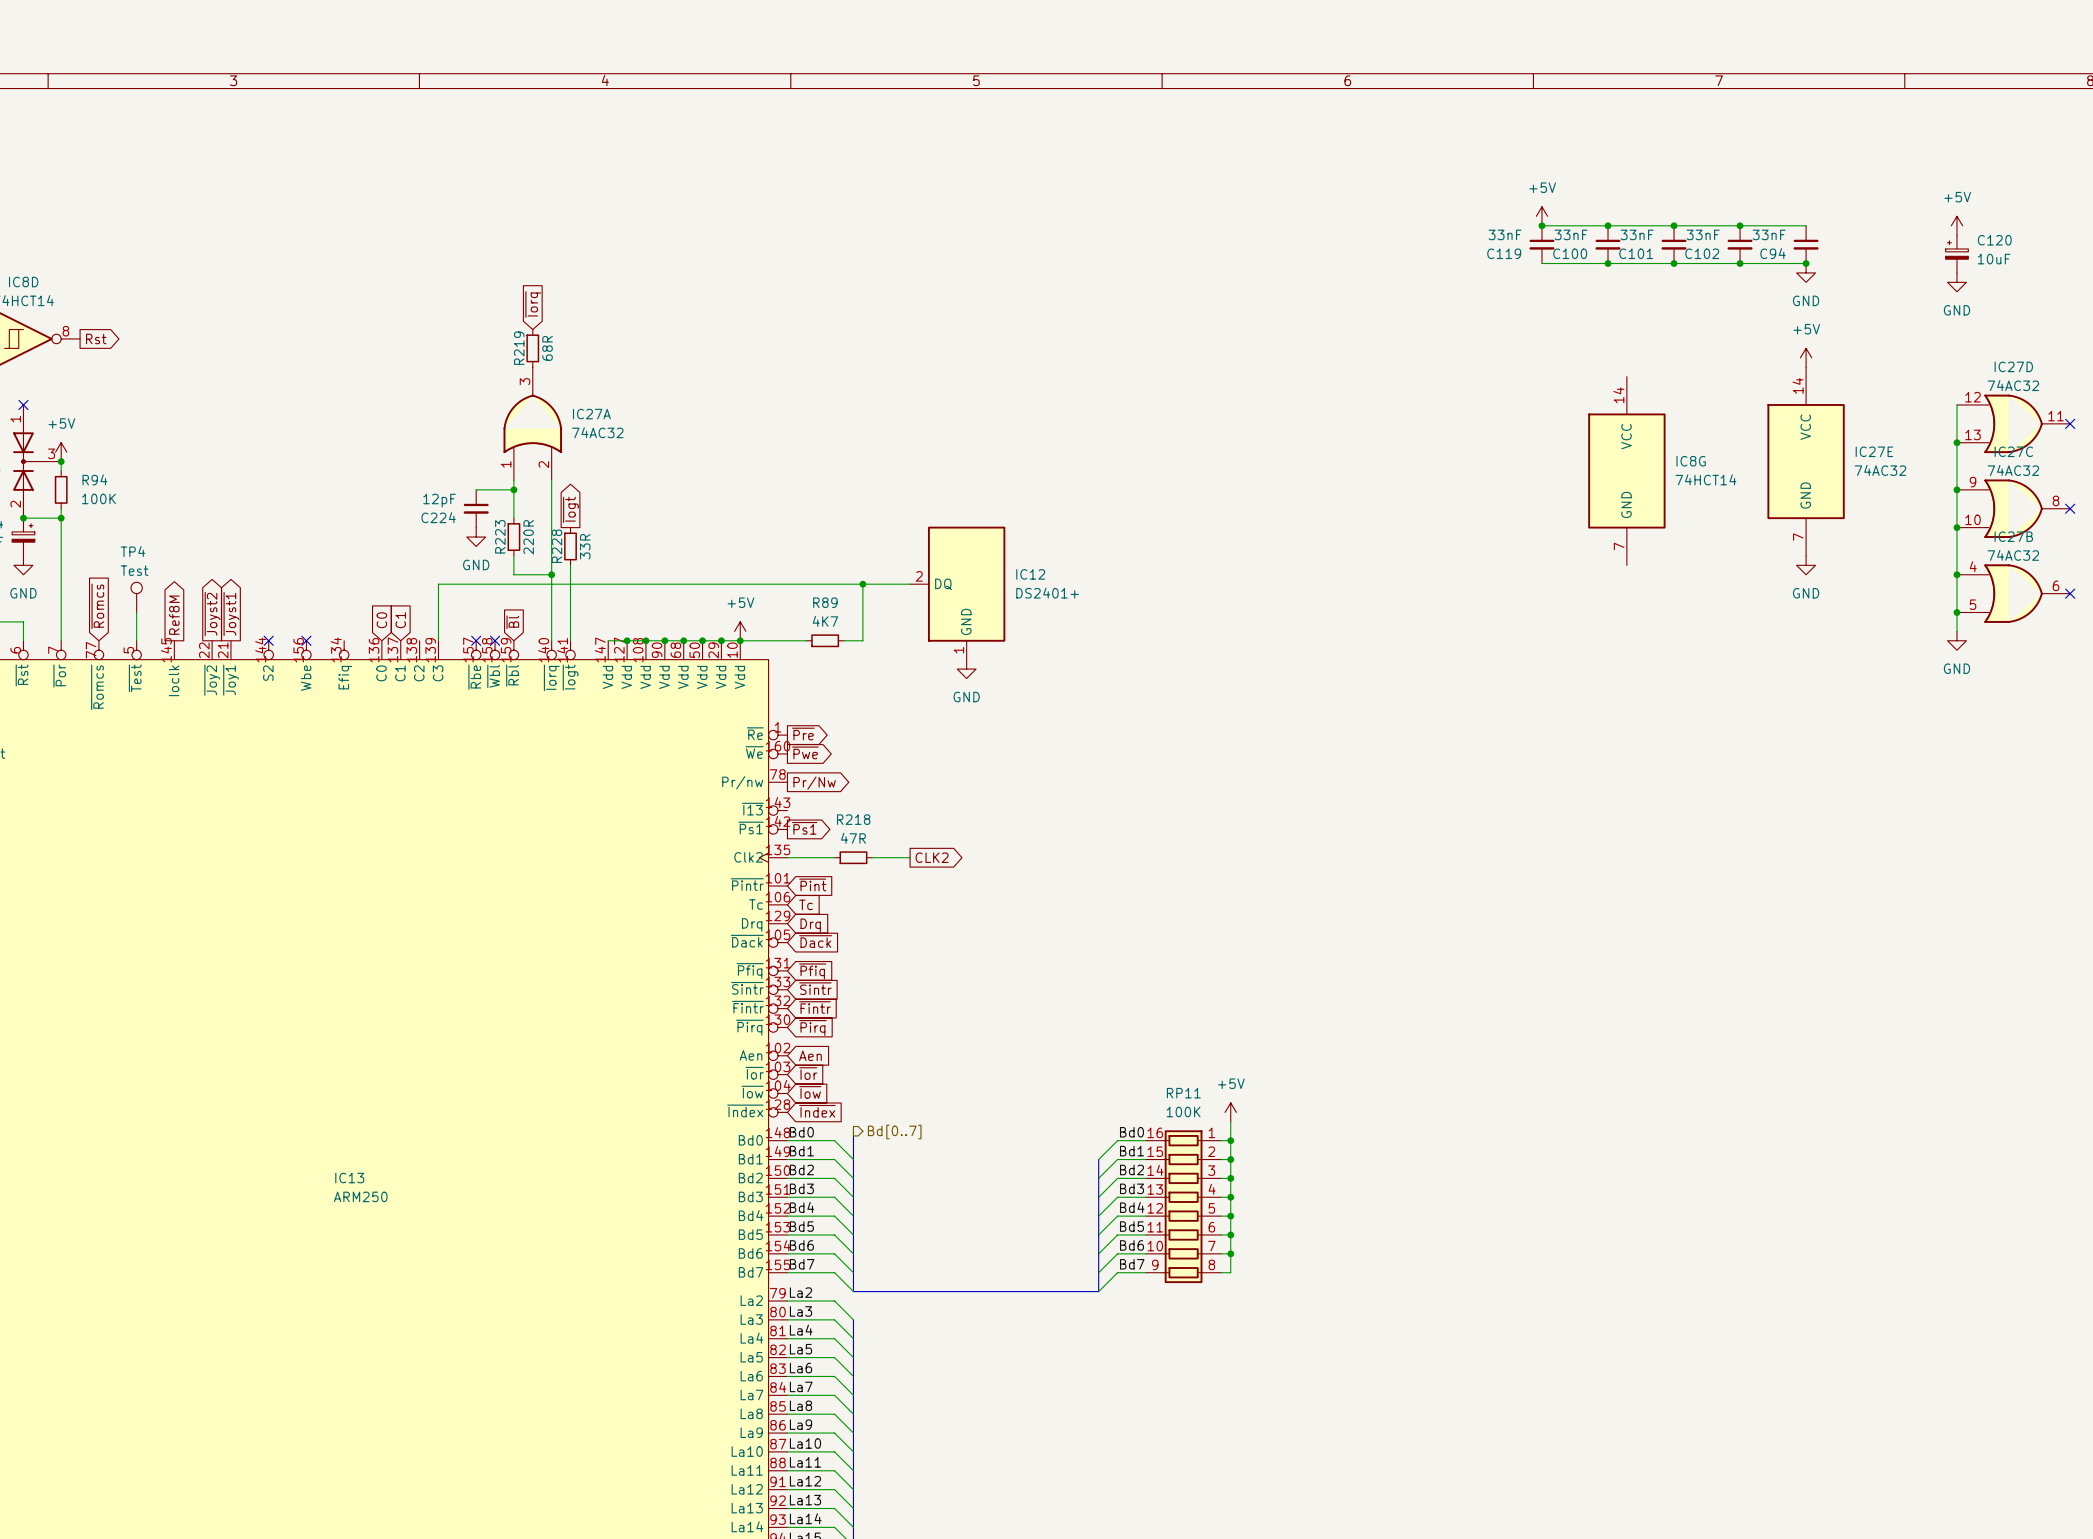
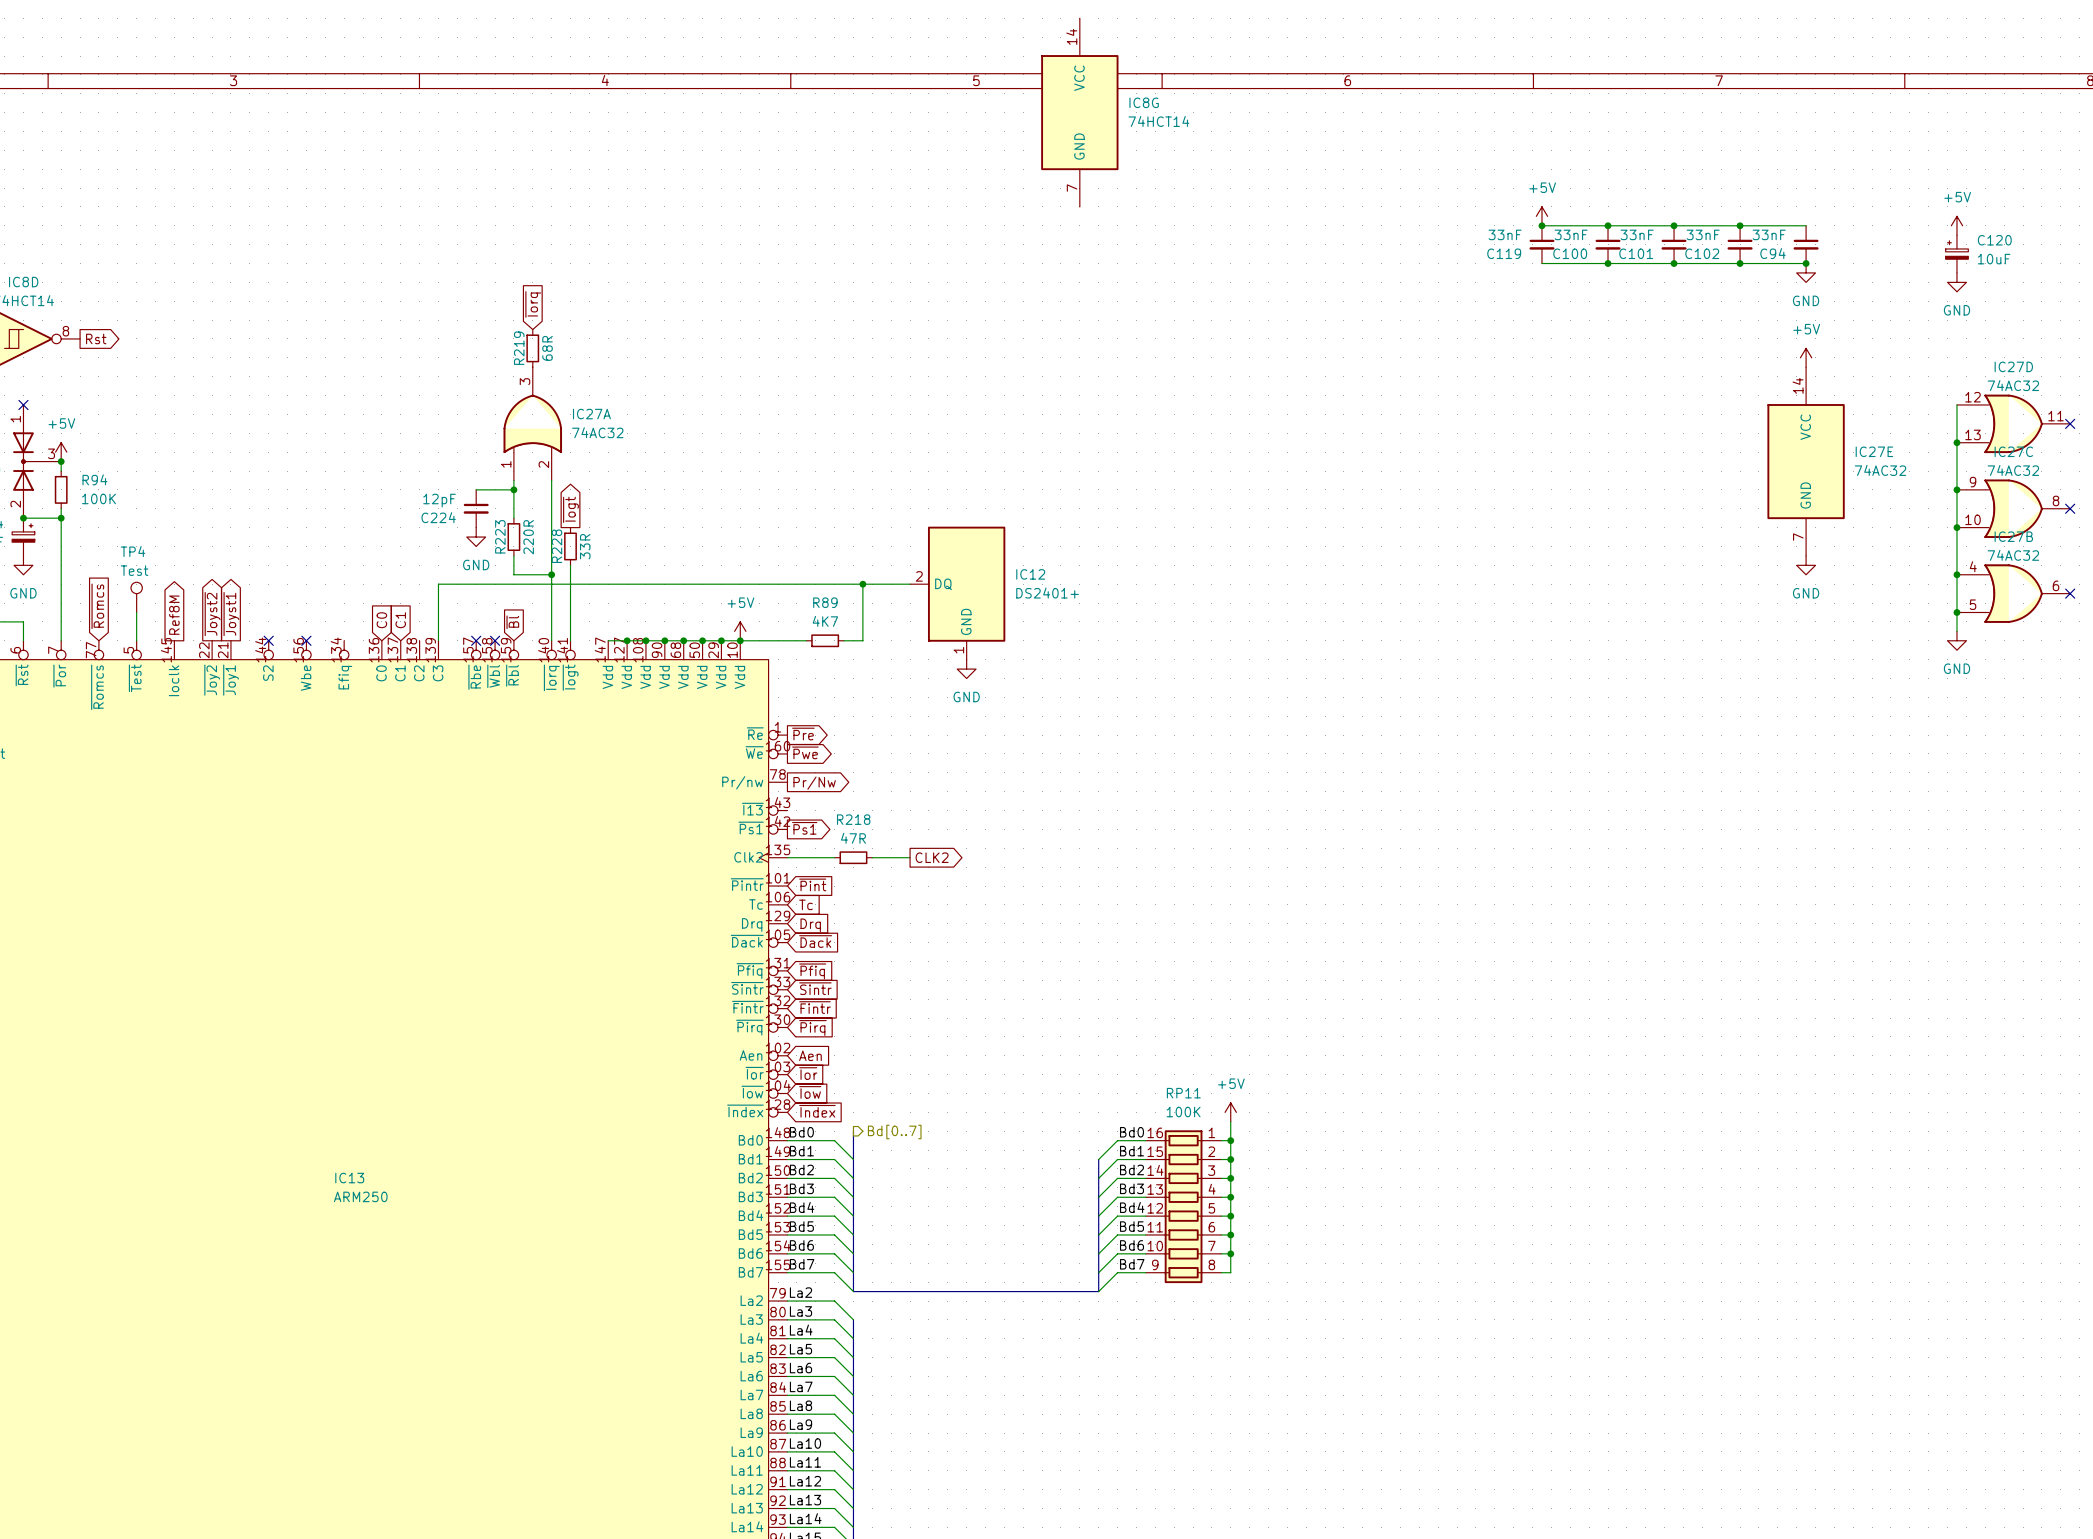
IC8G position: (1626, 471) -> (1079, 112)

